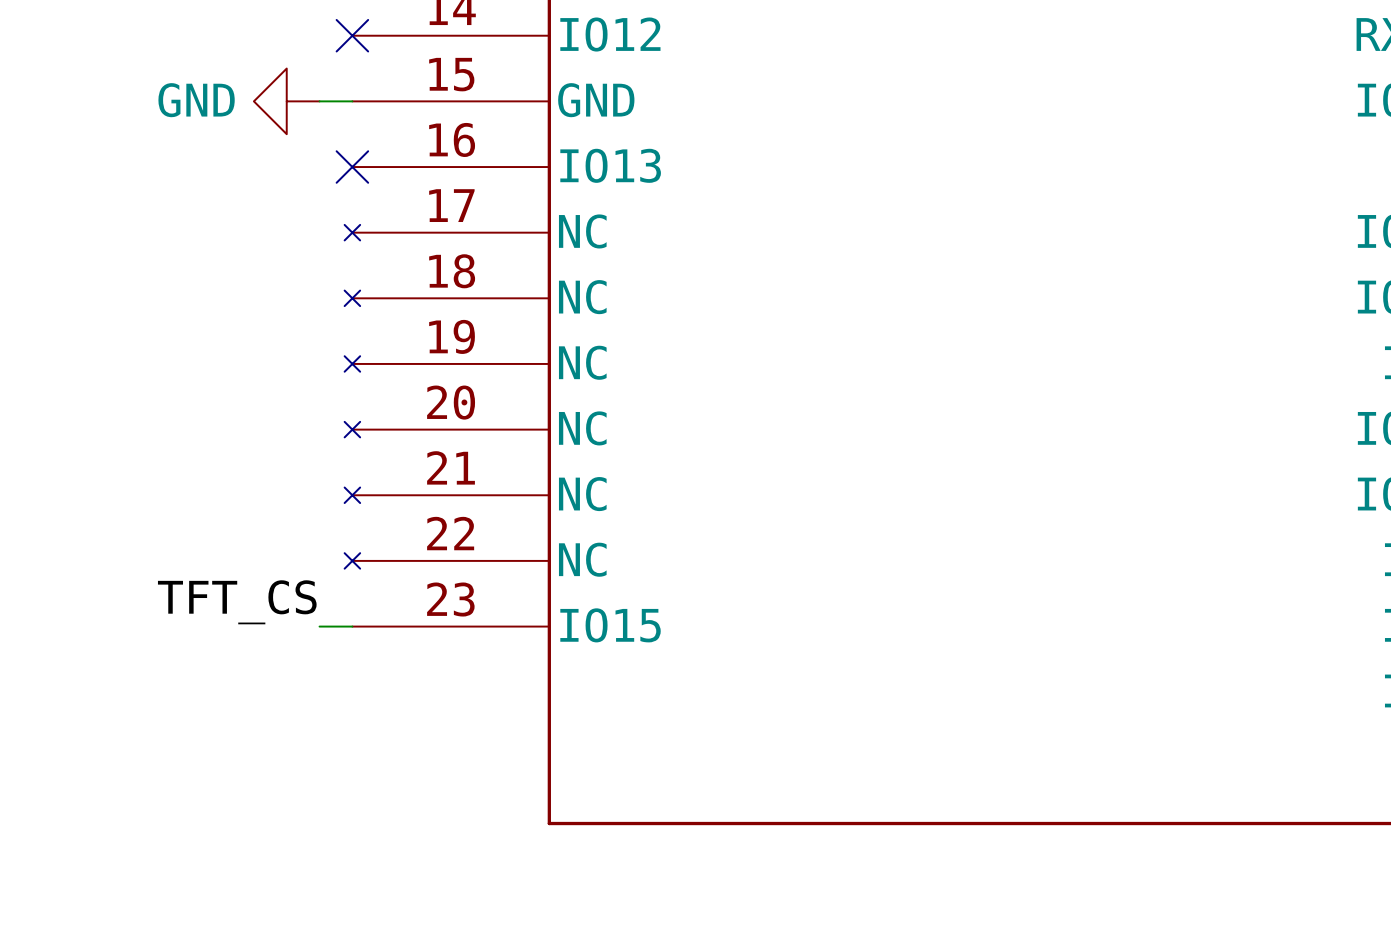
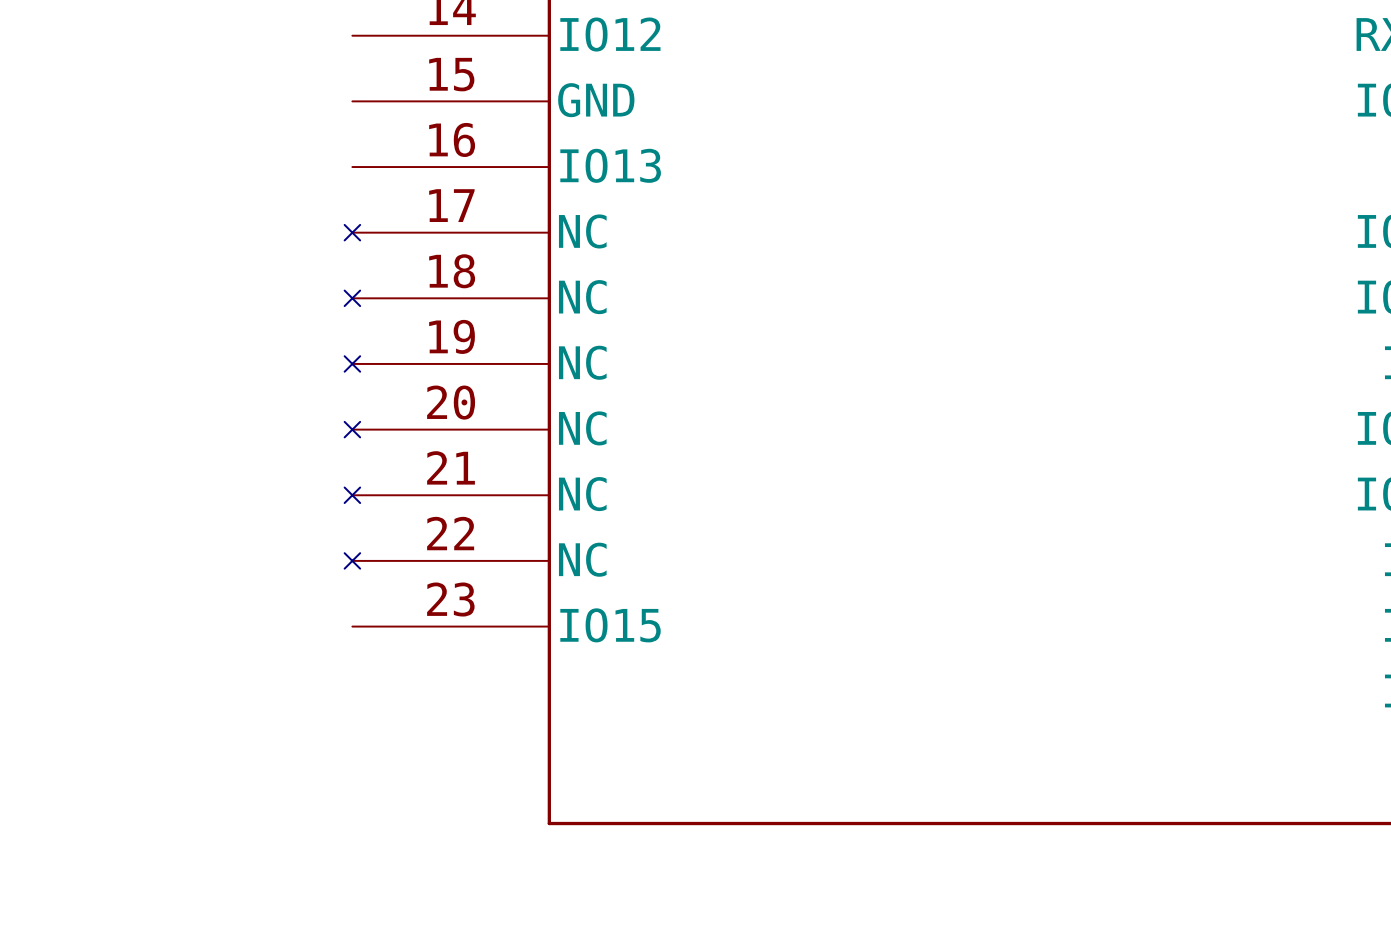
no-connect mark: (352, 35) -> none
power symbol: GND (286, 101) -> none
wire: (319, 101) (352, 101) -> none
no-connect mark: (352, 167) -> none
label: TFT_CS (237, 602) -> none
wire: (319, 626) (352, 626) -> none

